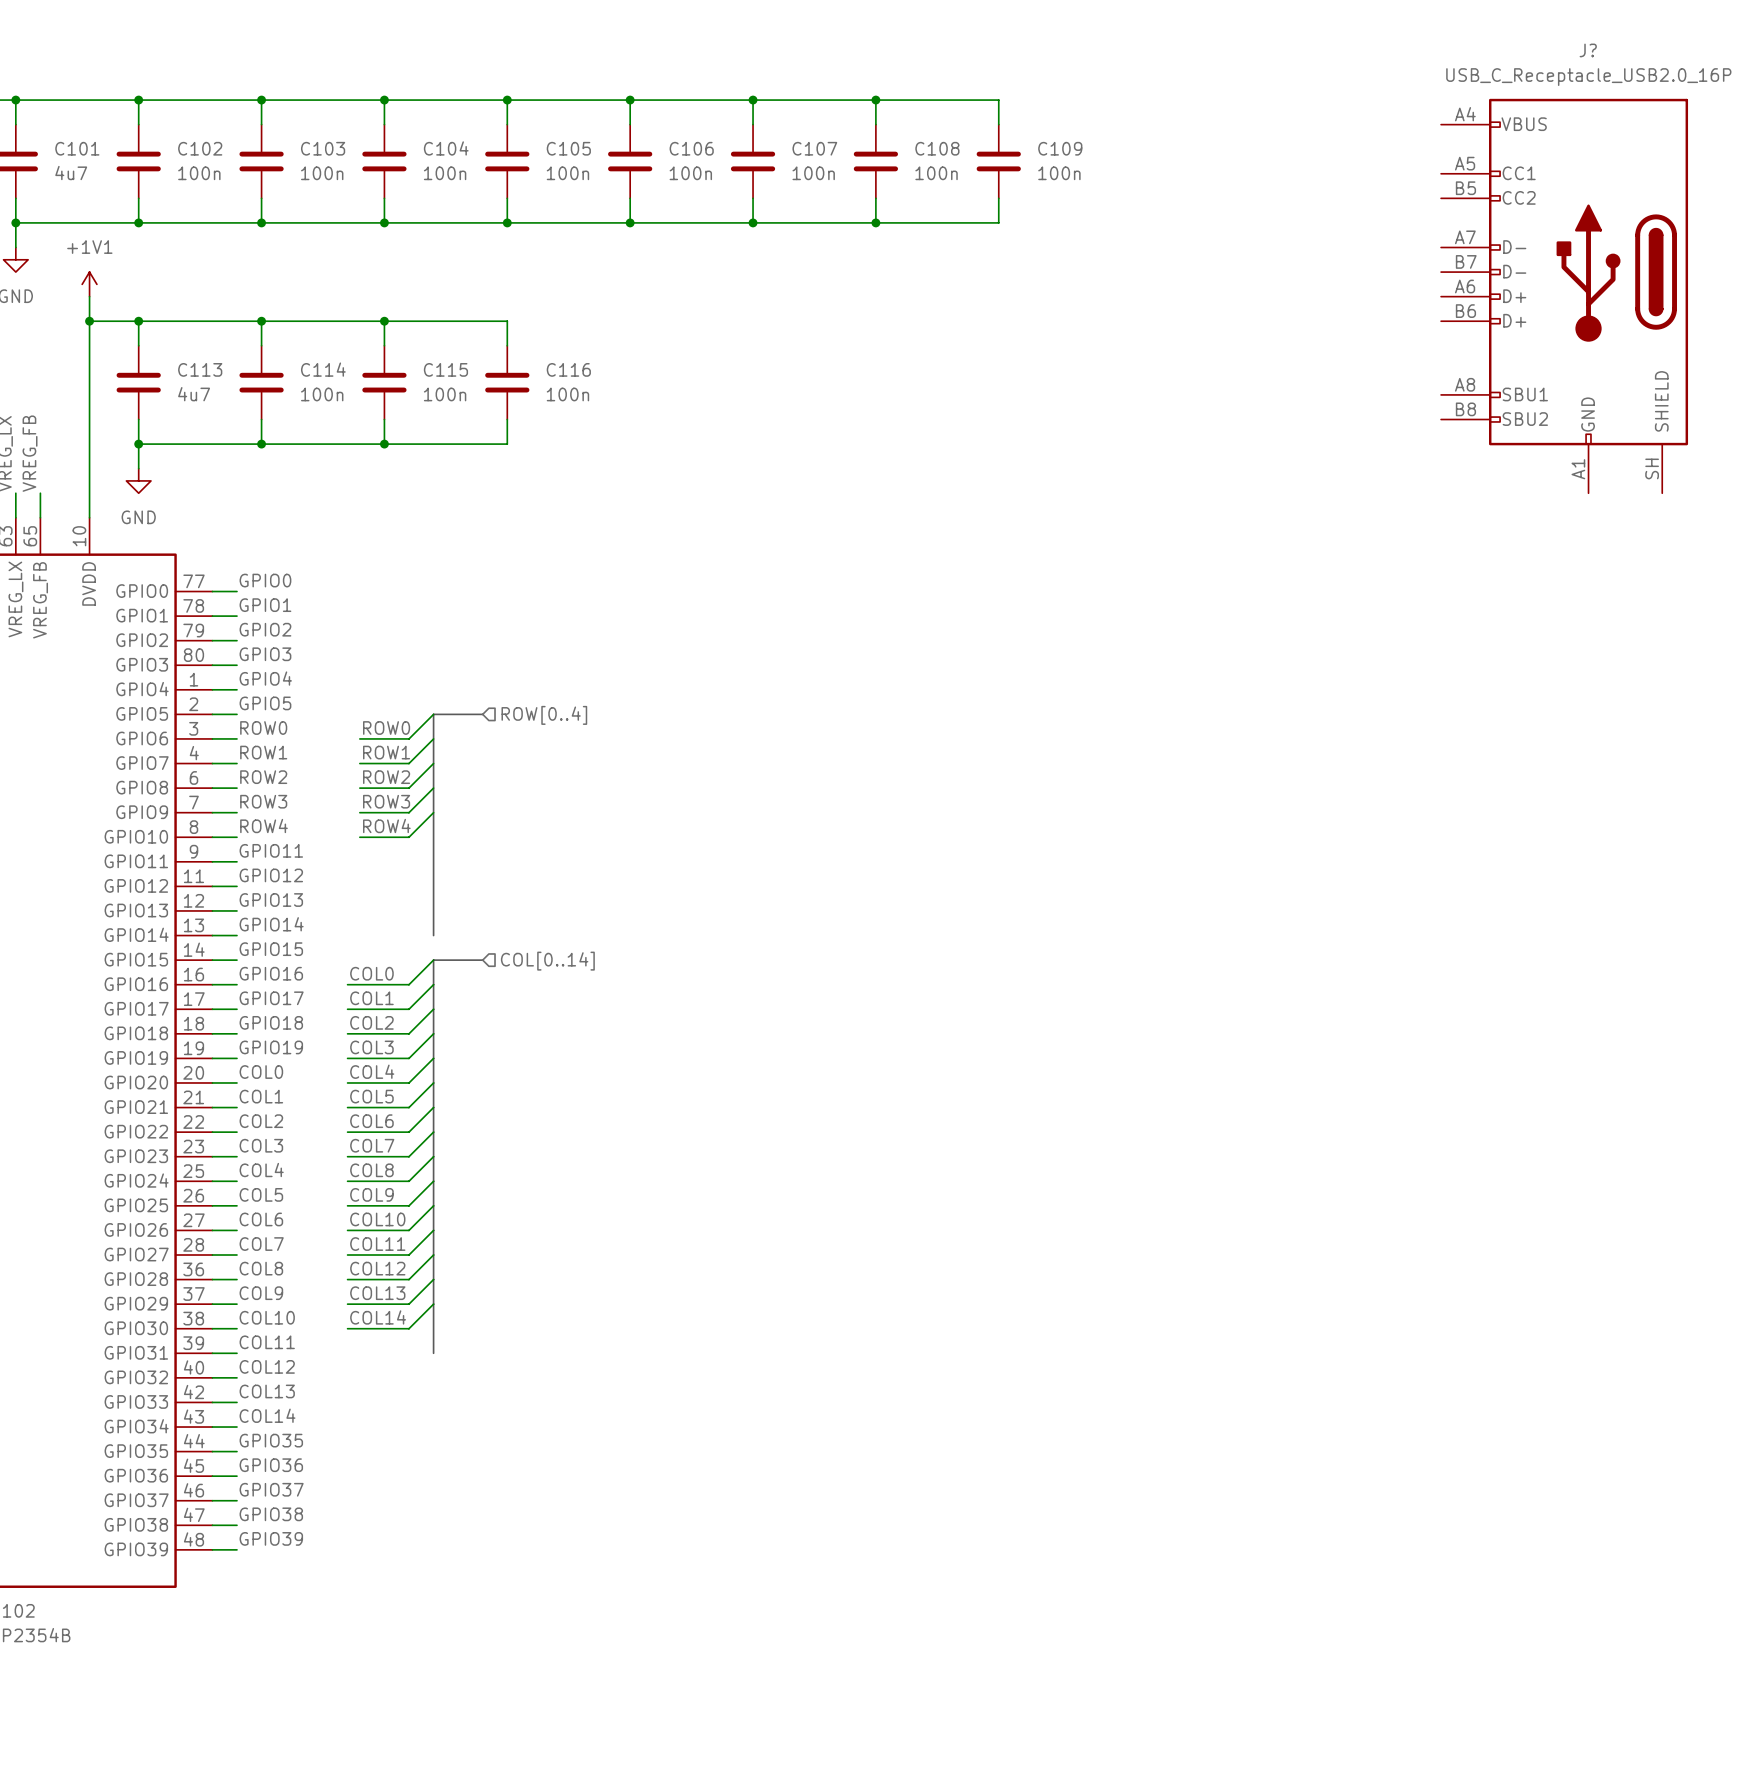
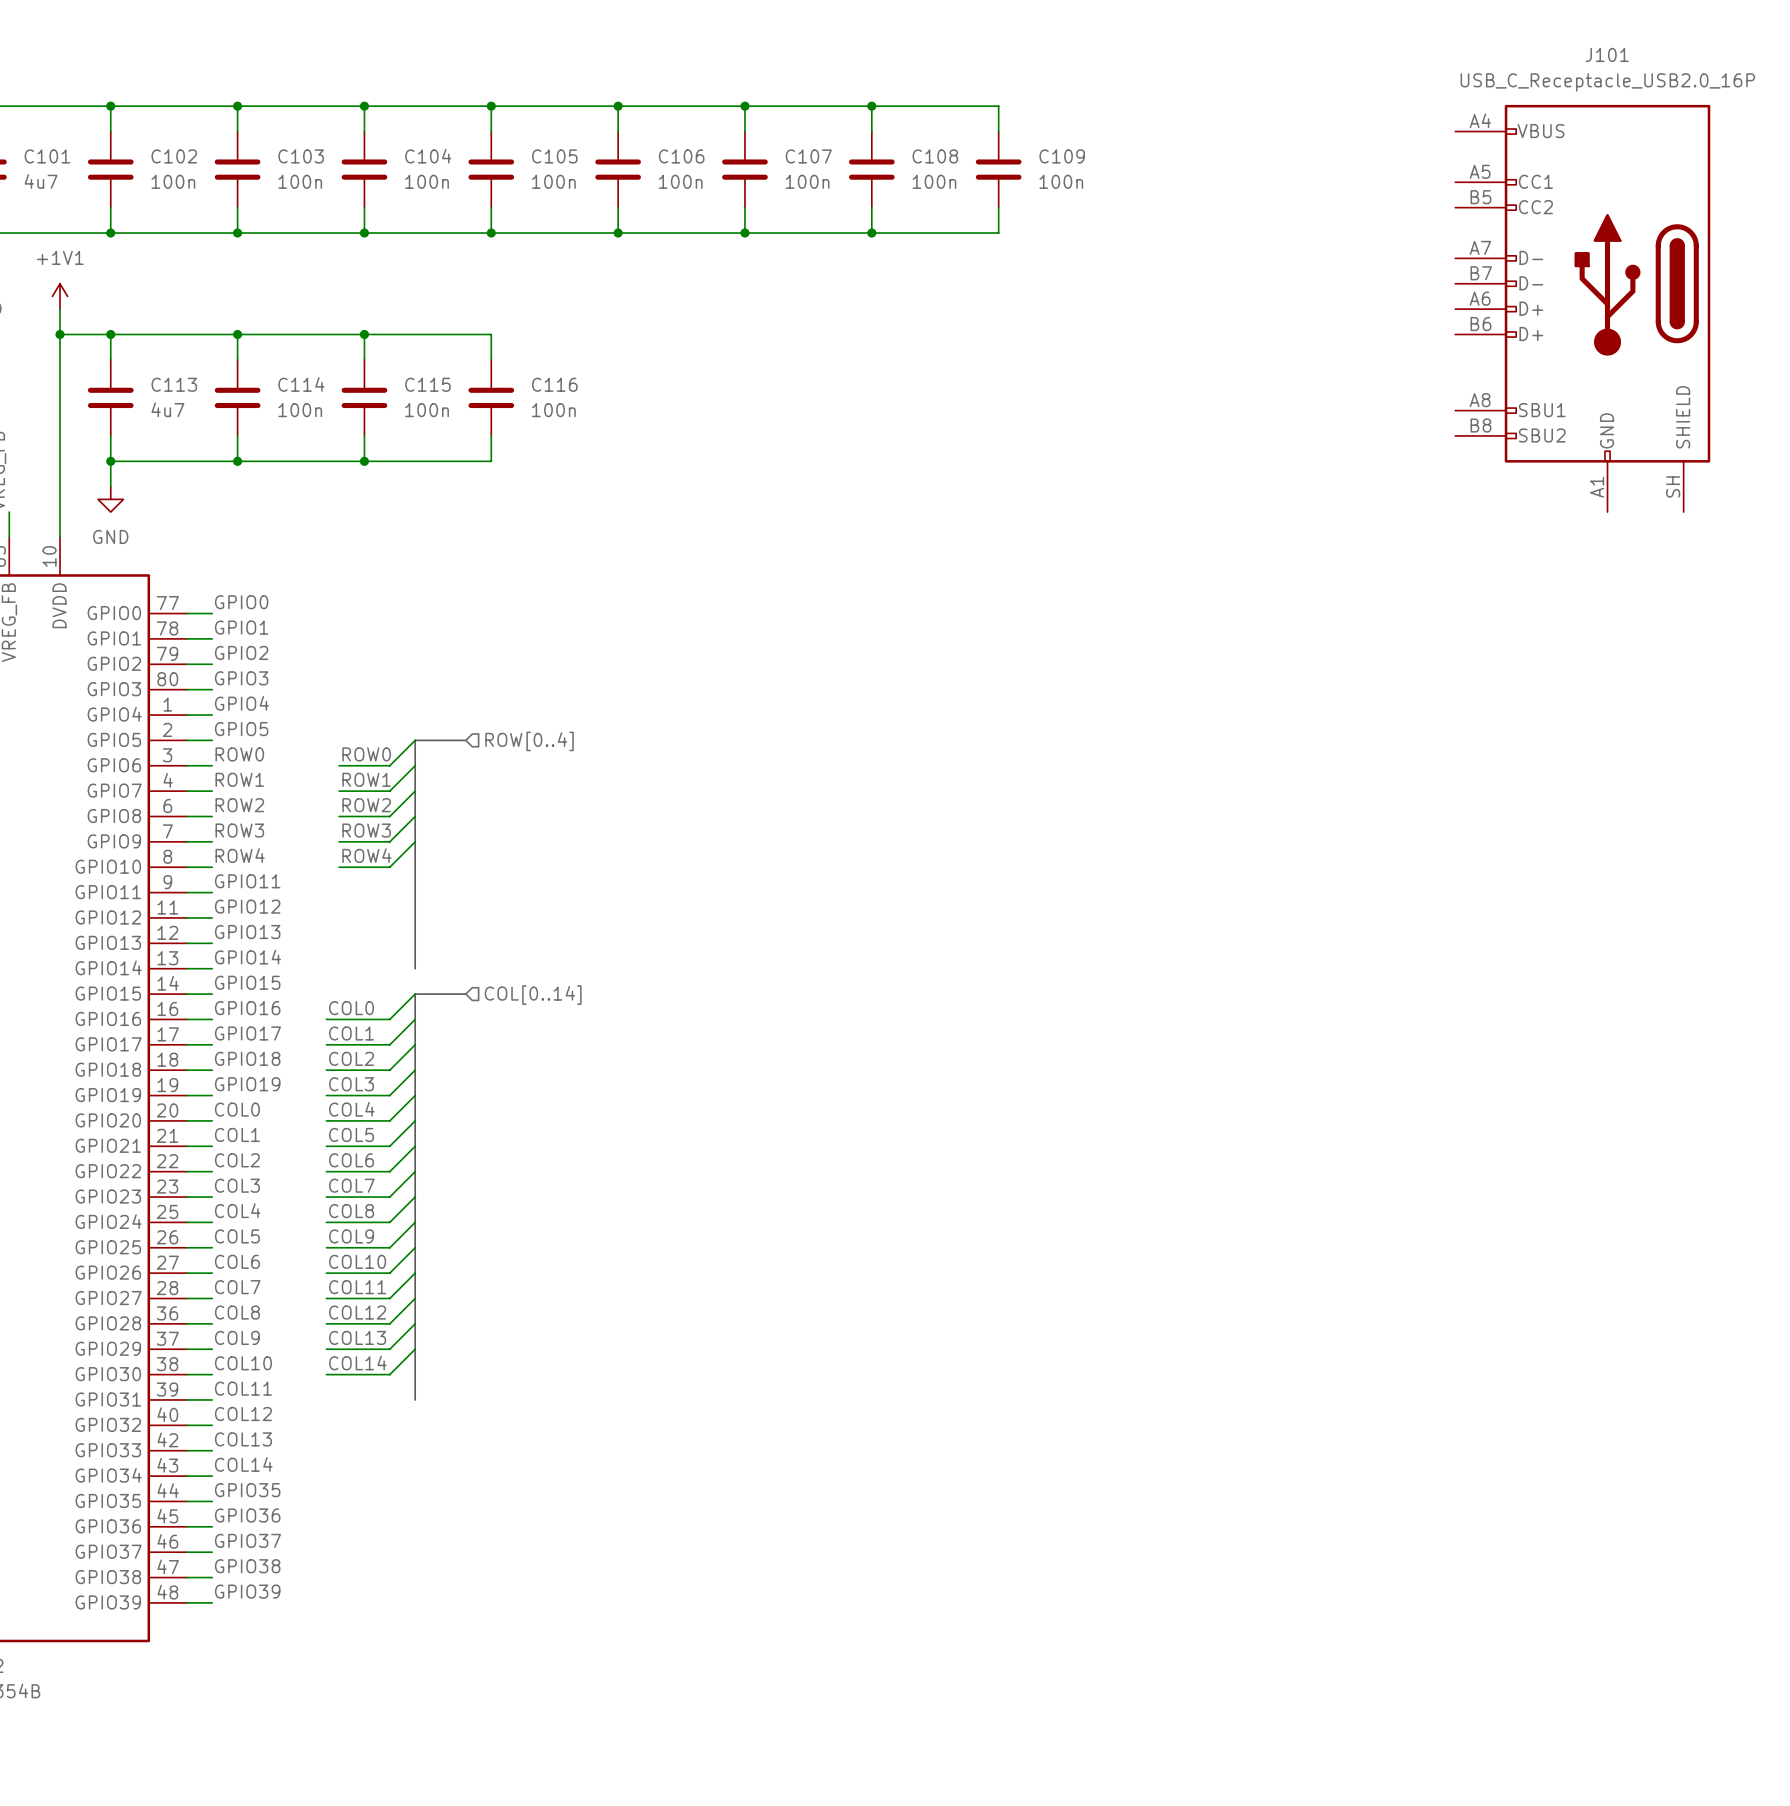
J? name: J? (1588, 50) -> J101 (1607, 54)

